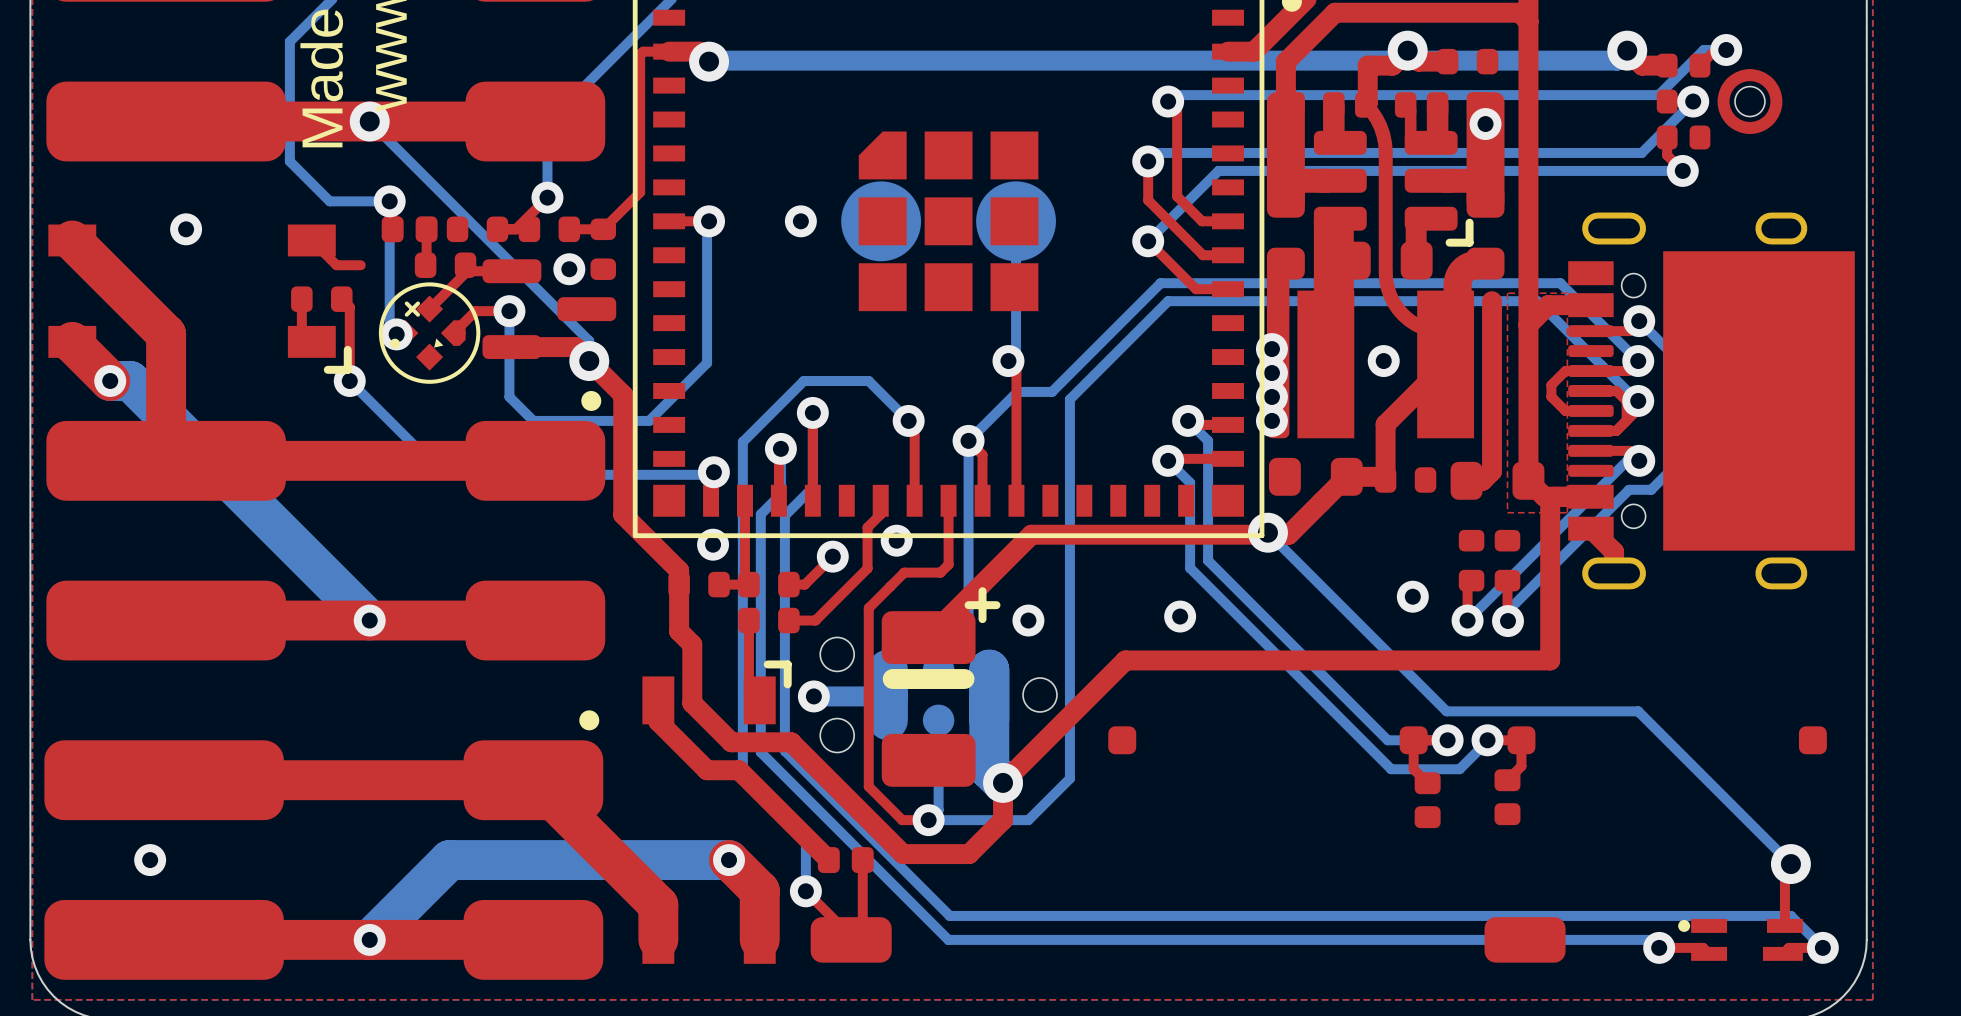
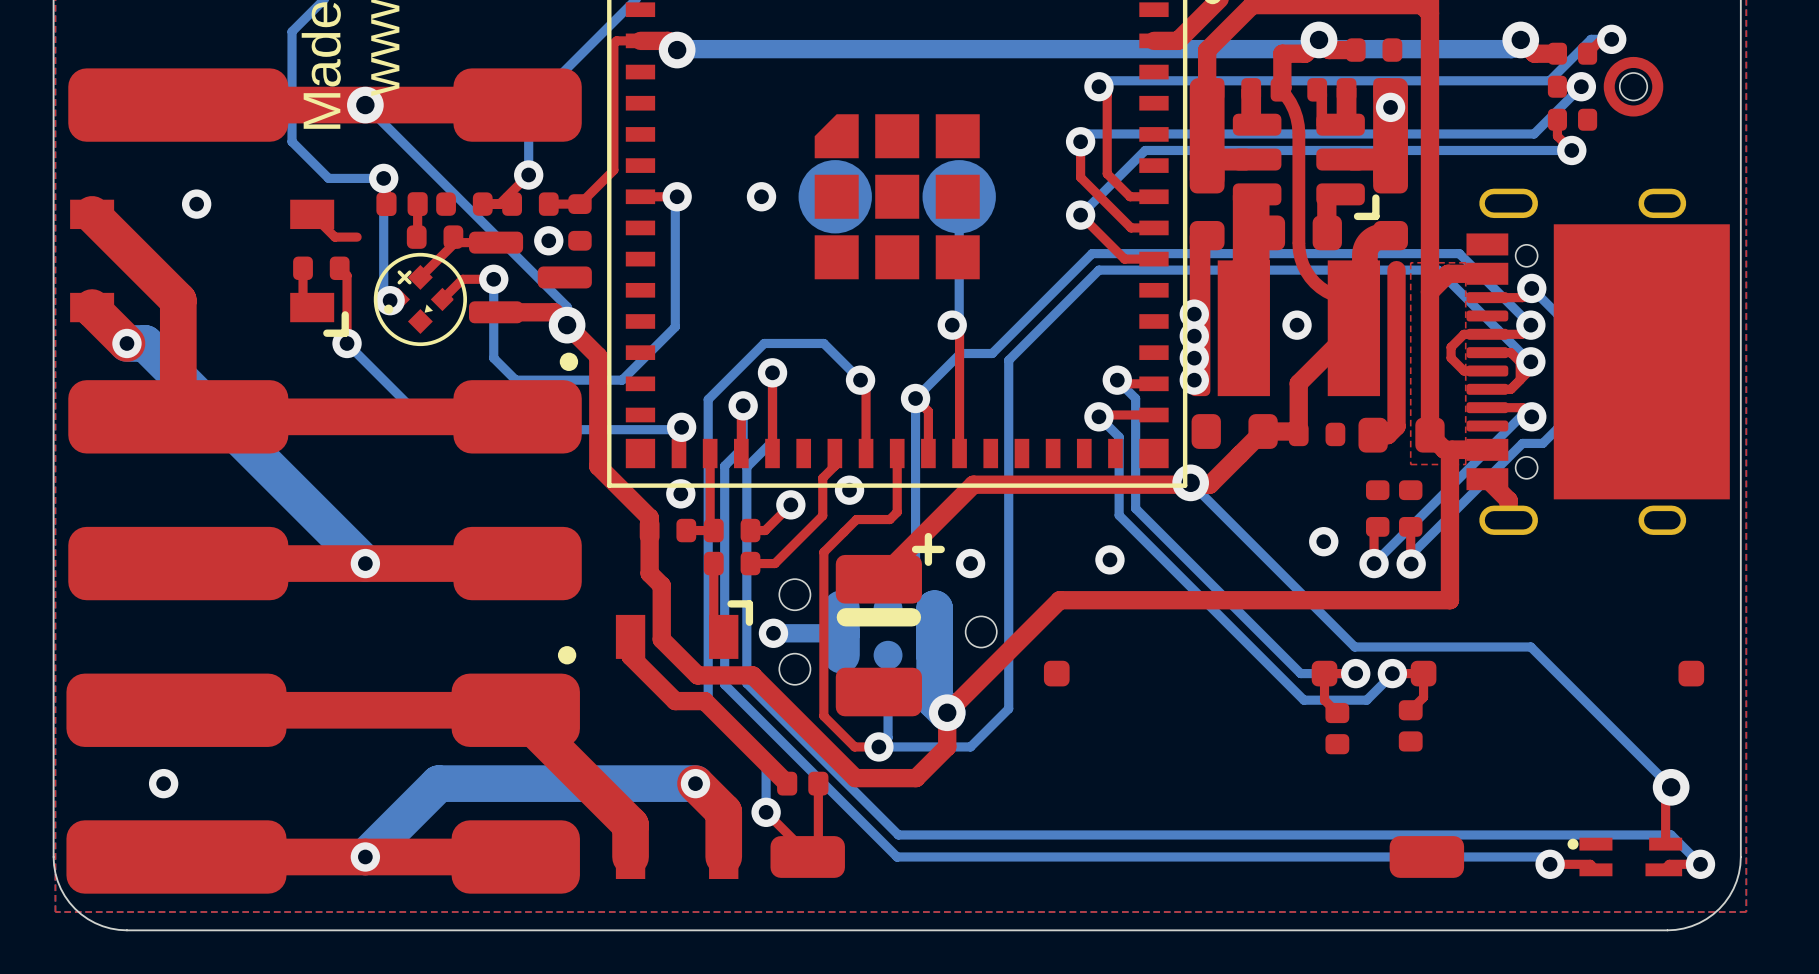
part footprint: [390, 295, 466, 371] -> [384, 264, 454, 334]

